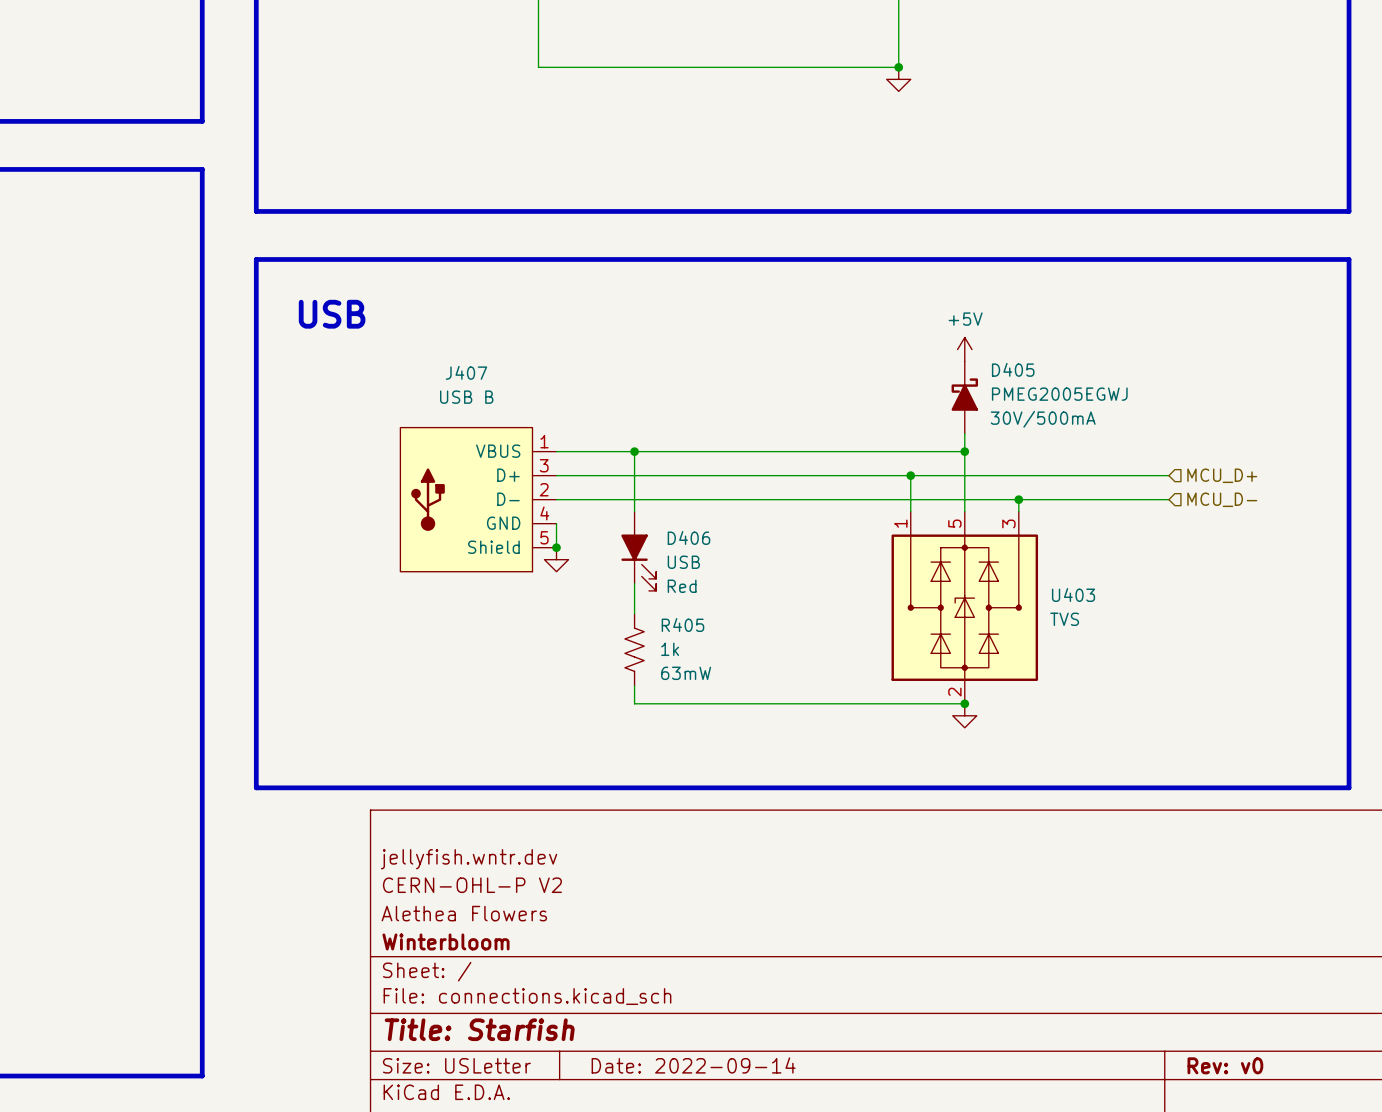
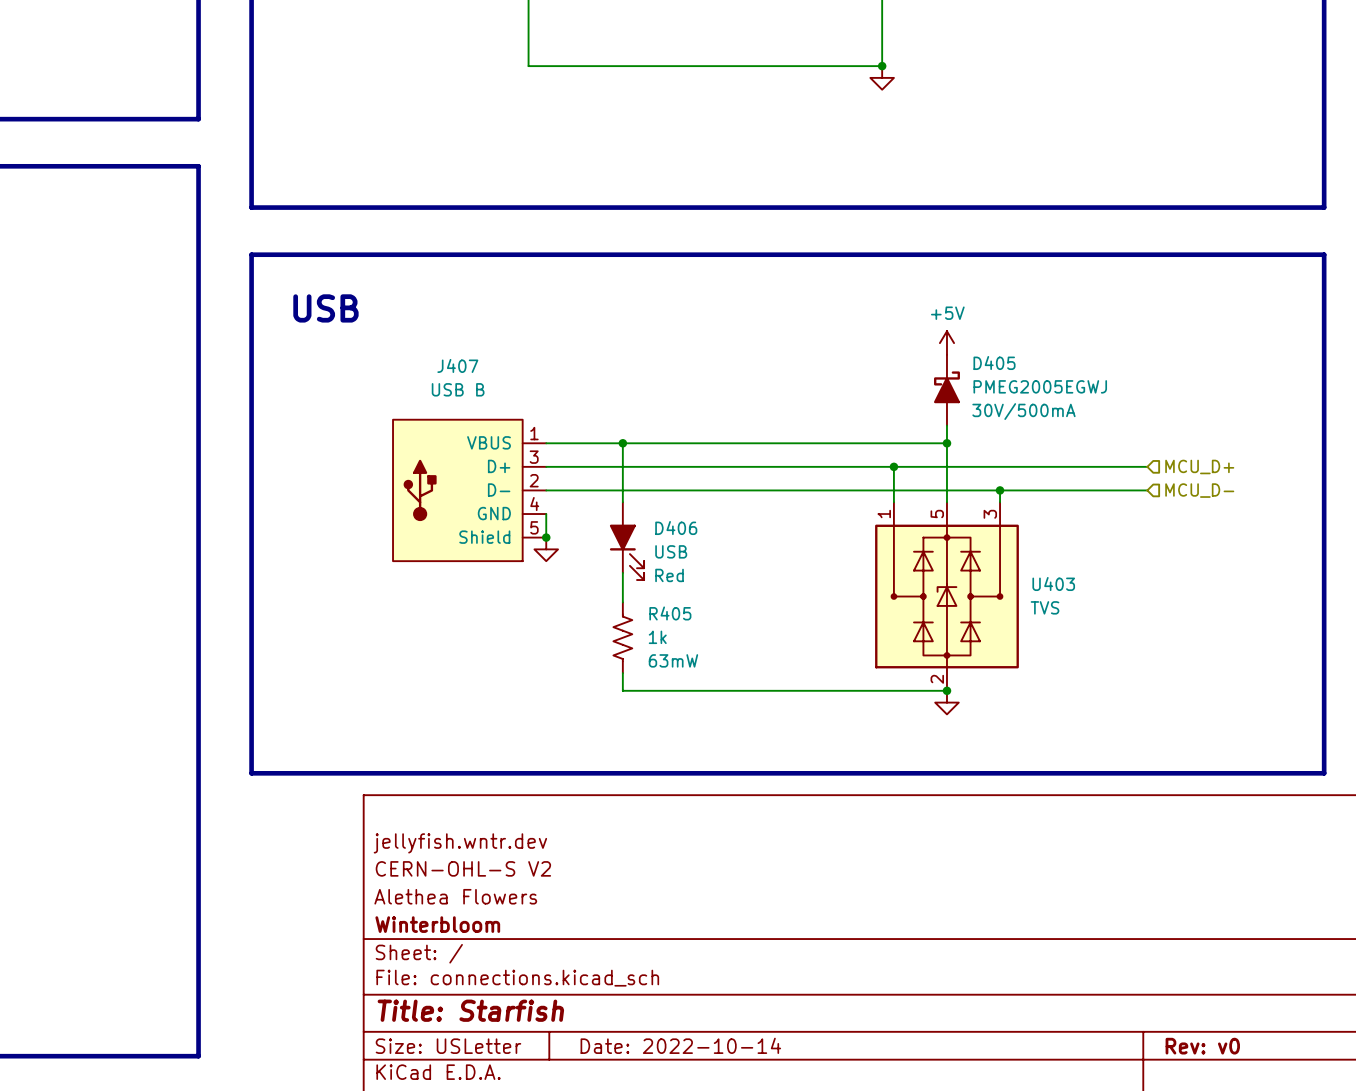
title block: CERN-OHL-P V2 (472, 885) -> CERN-OHL-S V2 (463, 868)
title block: Date: 2022-09-14 (693, 1065) -> Date: 2022-10-14 (680, 1045)

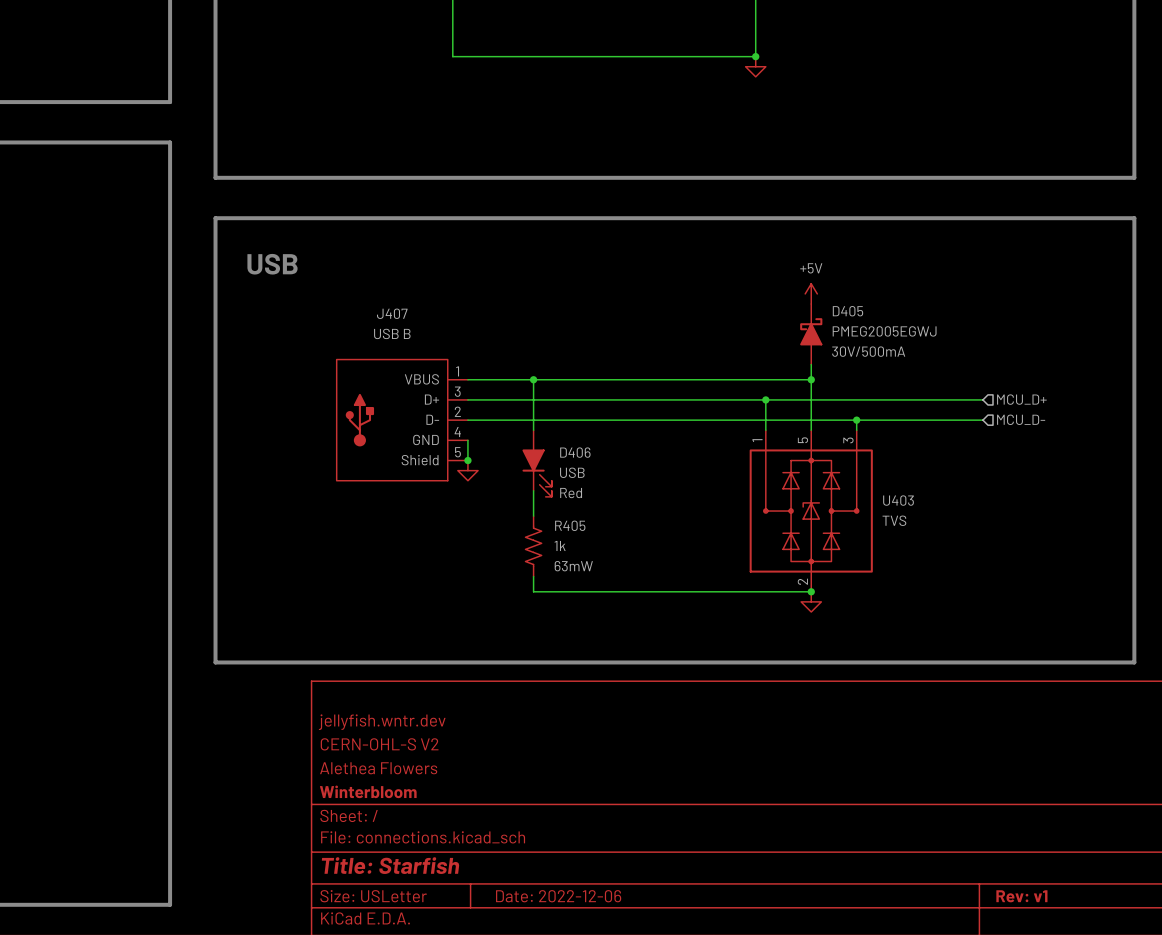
title block: Date: 2022-10-14 (680, 1045) -> Date: 2022-12-06 (558, 896)
title block: Rev: v0 (1202, 1046) -> Rev: v1 (1021, 896)

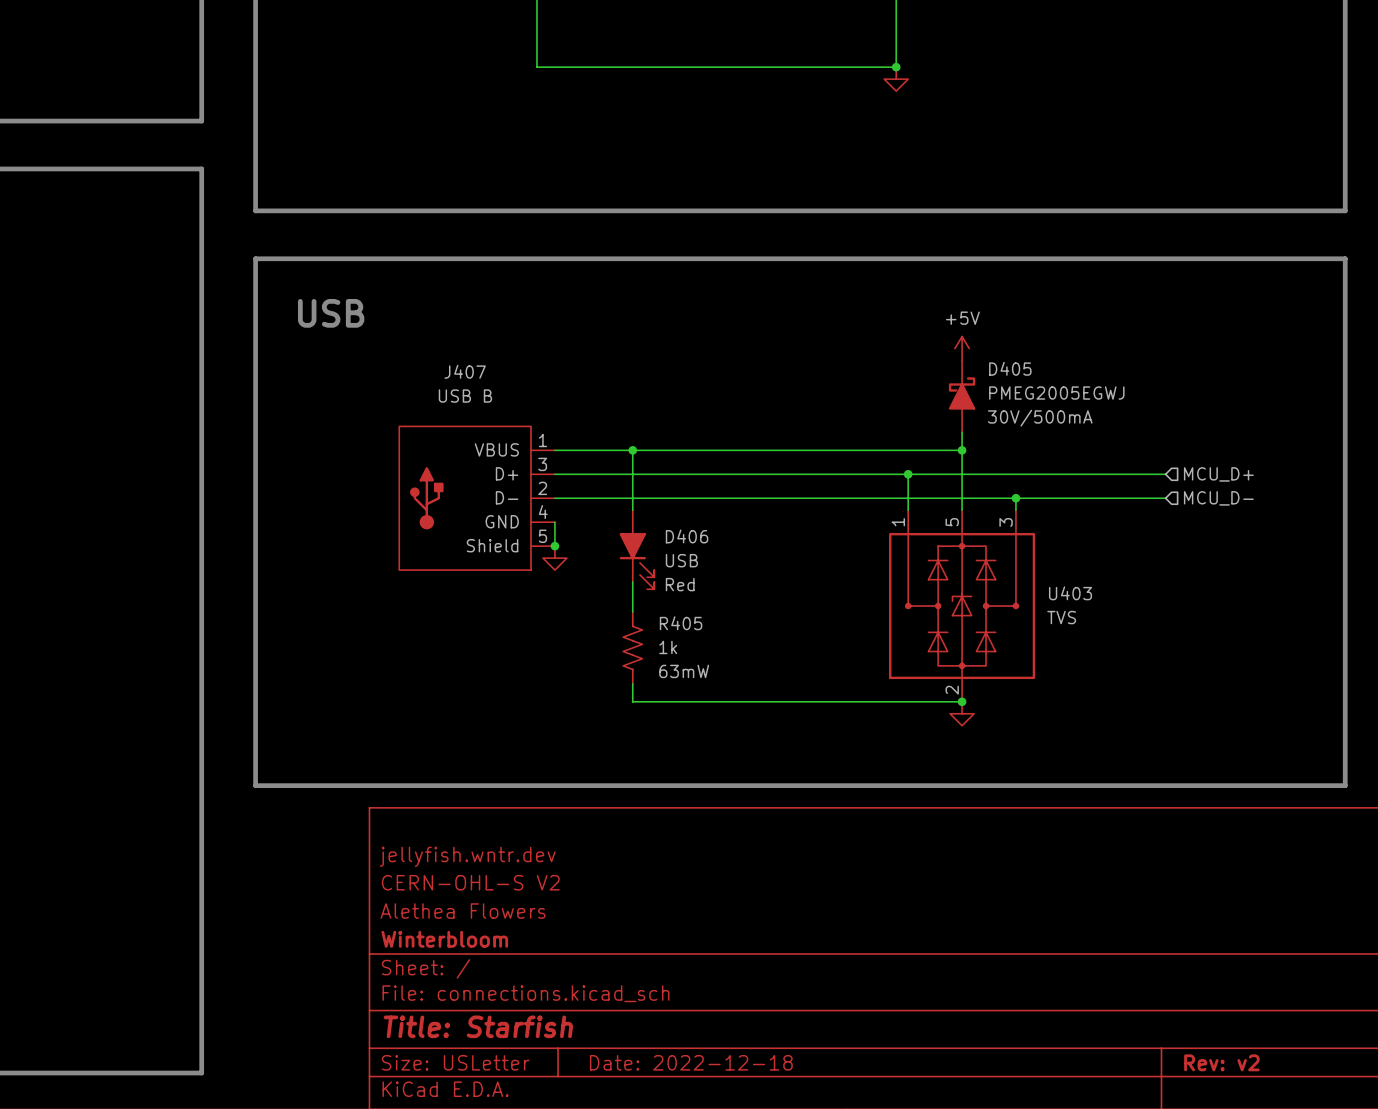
title block: Date: 2022-12-06 (558, 896) -> Date: 2022-12-18 (691, 1062)
title block: Rev: v1 (1021, 896) -> Rev: v2 (1221, 1062)

